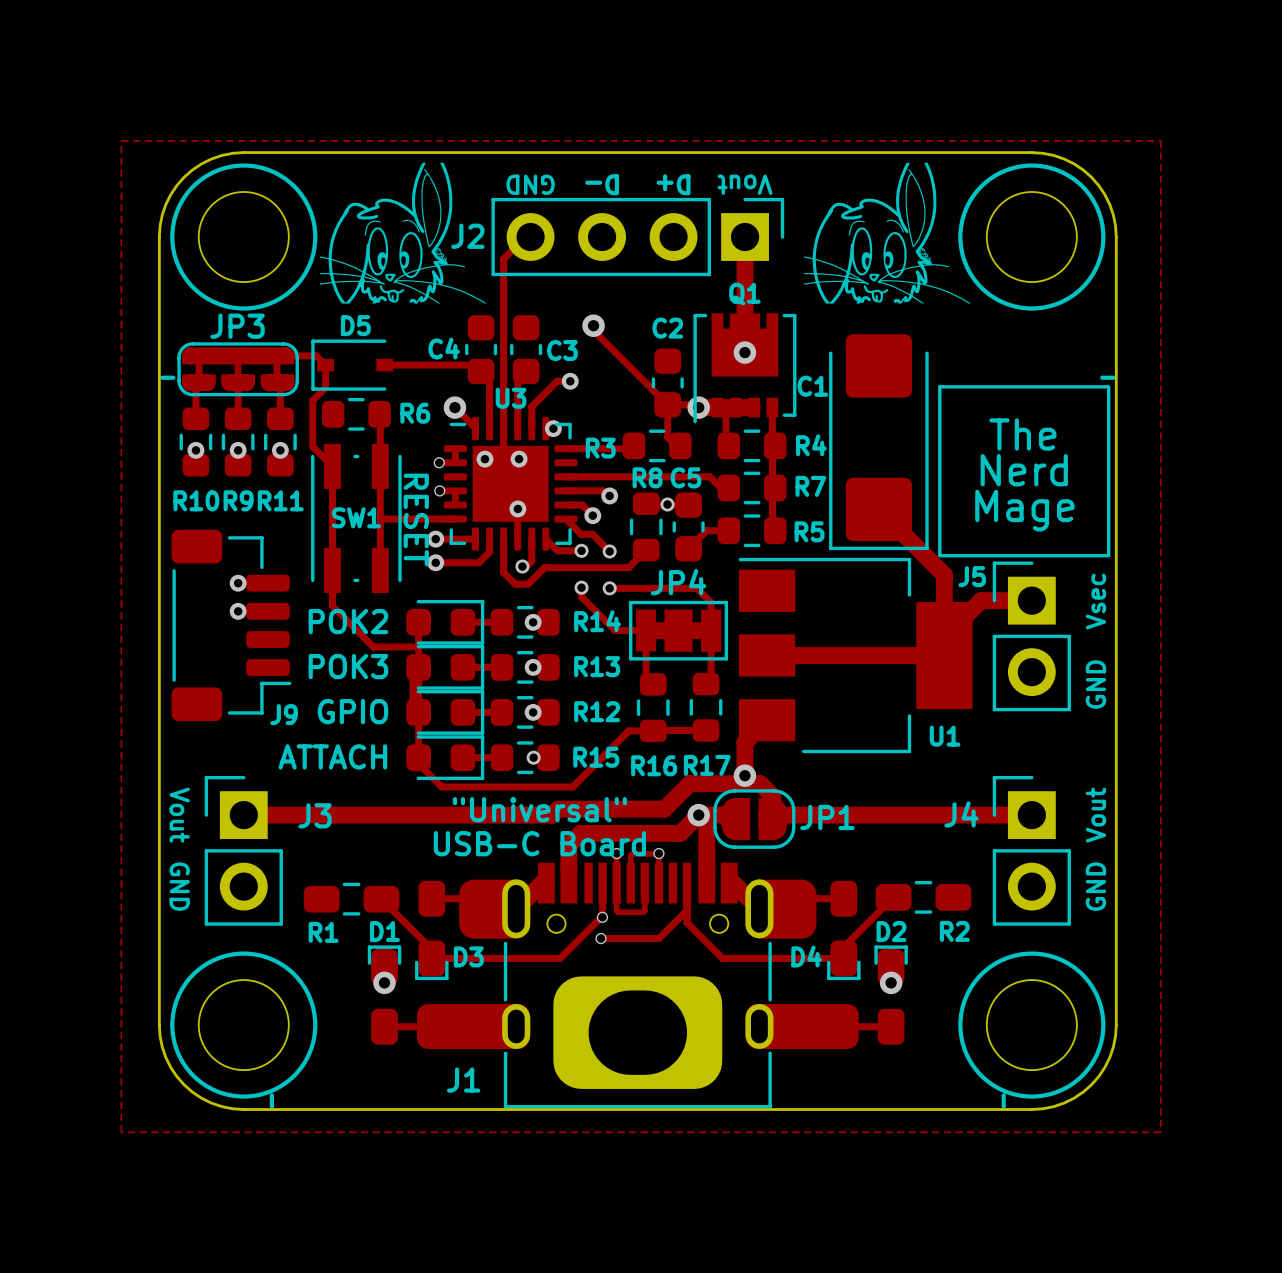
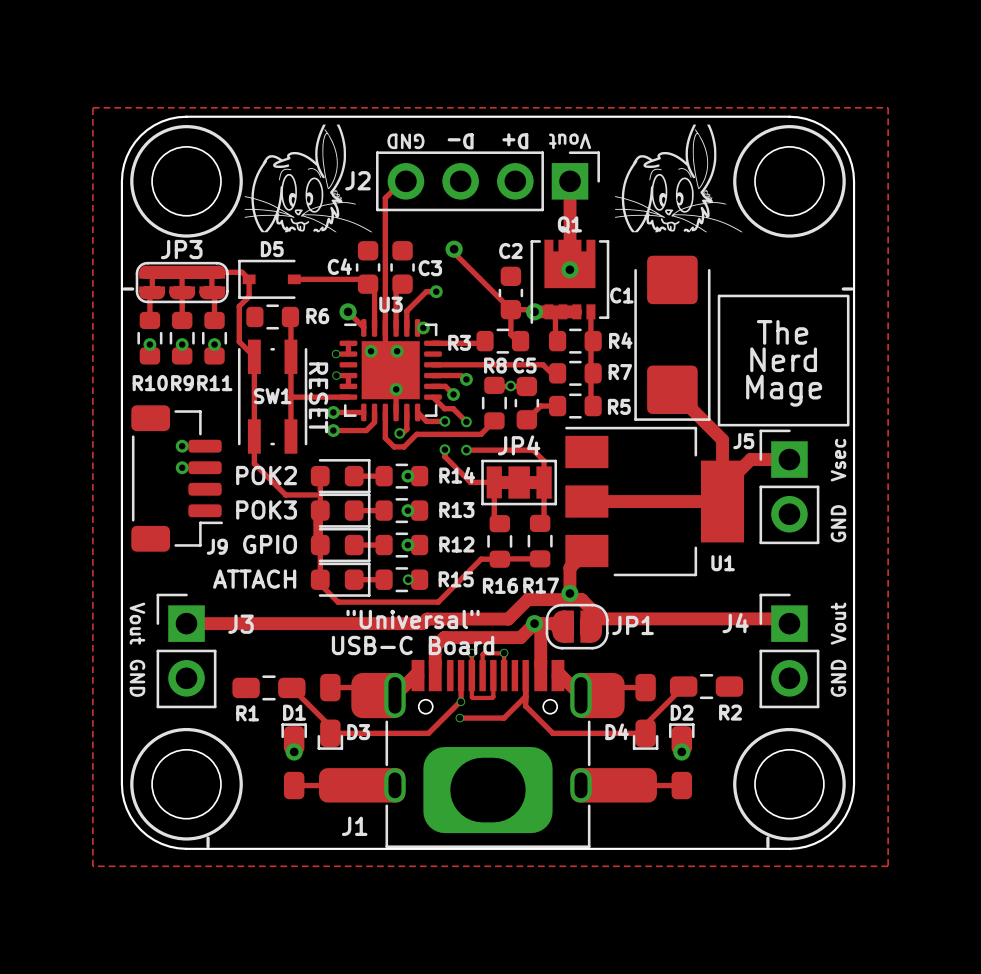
track: none -> (591, 609) (600, 618) (789, 618)
track: (1031, 815) (776, 815) (772, 819) -> none

